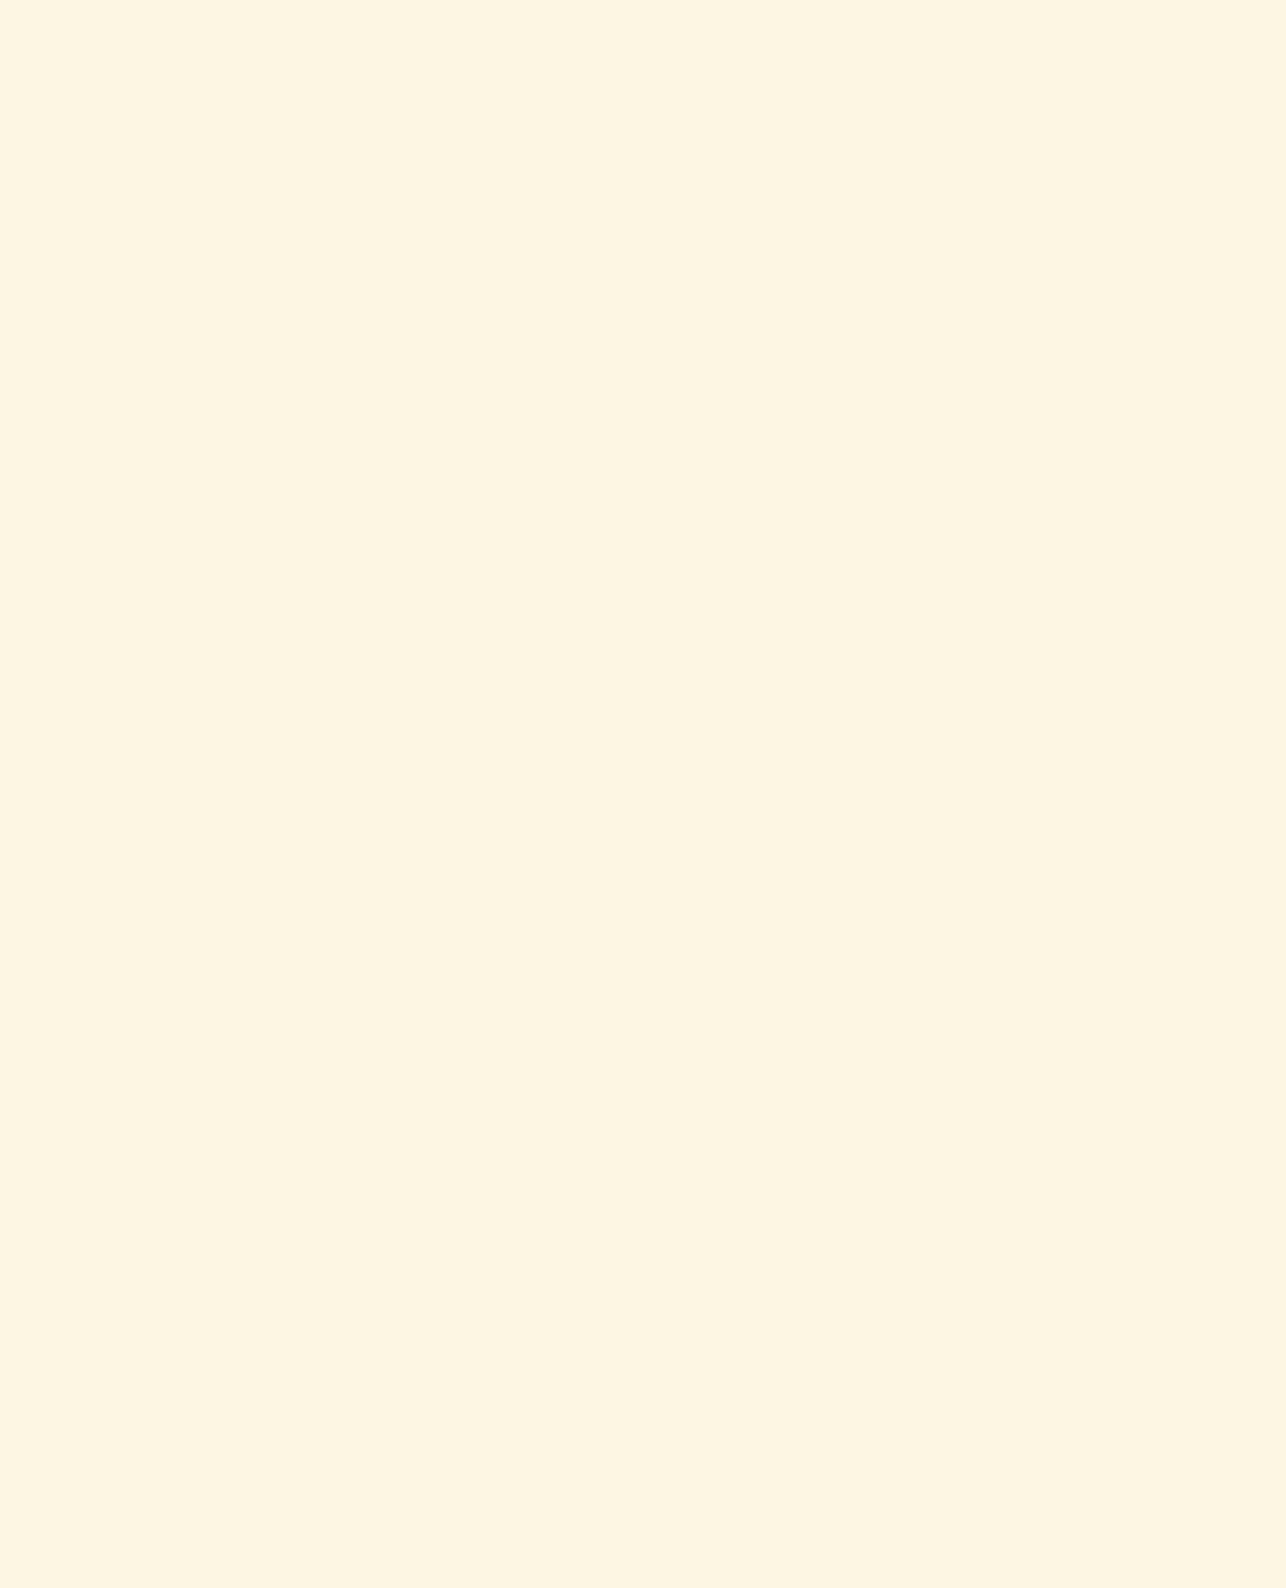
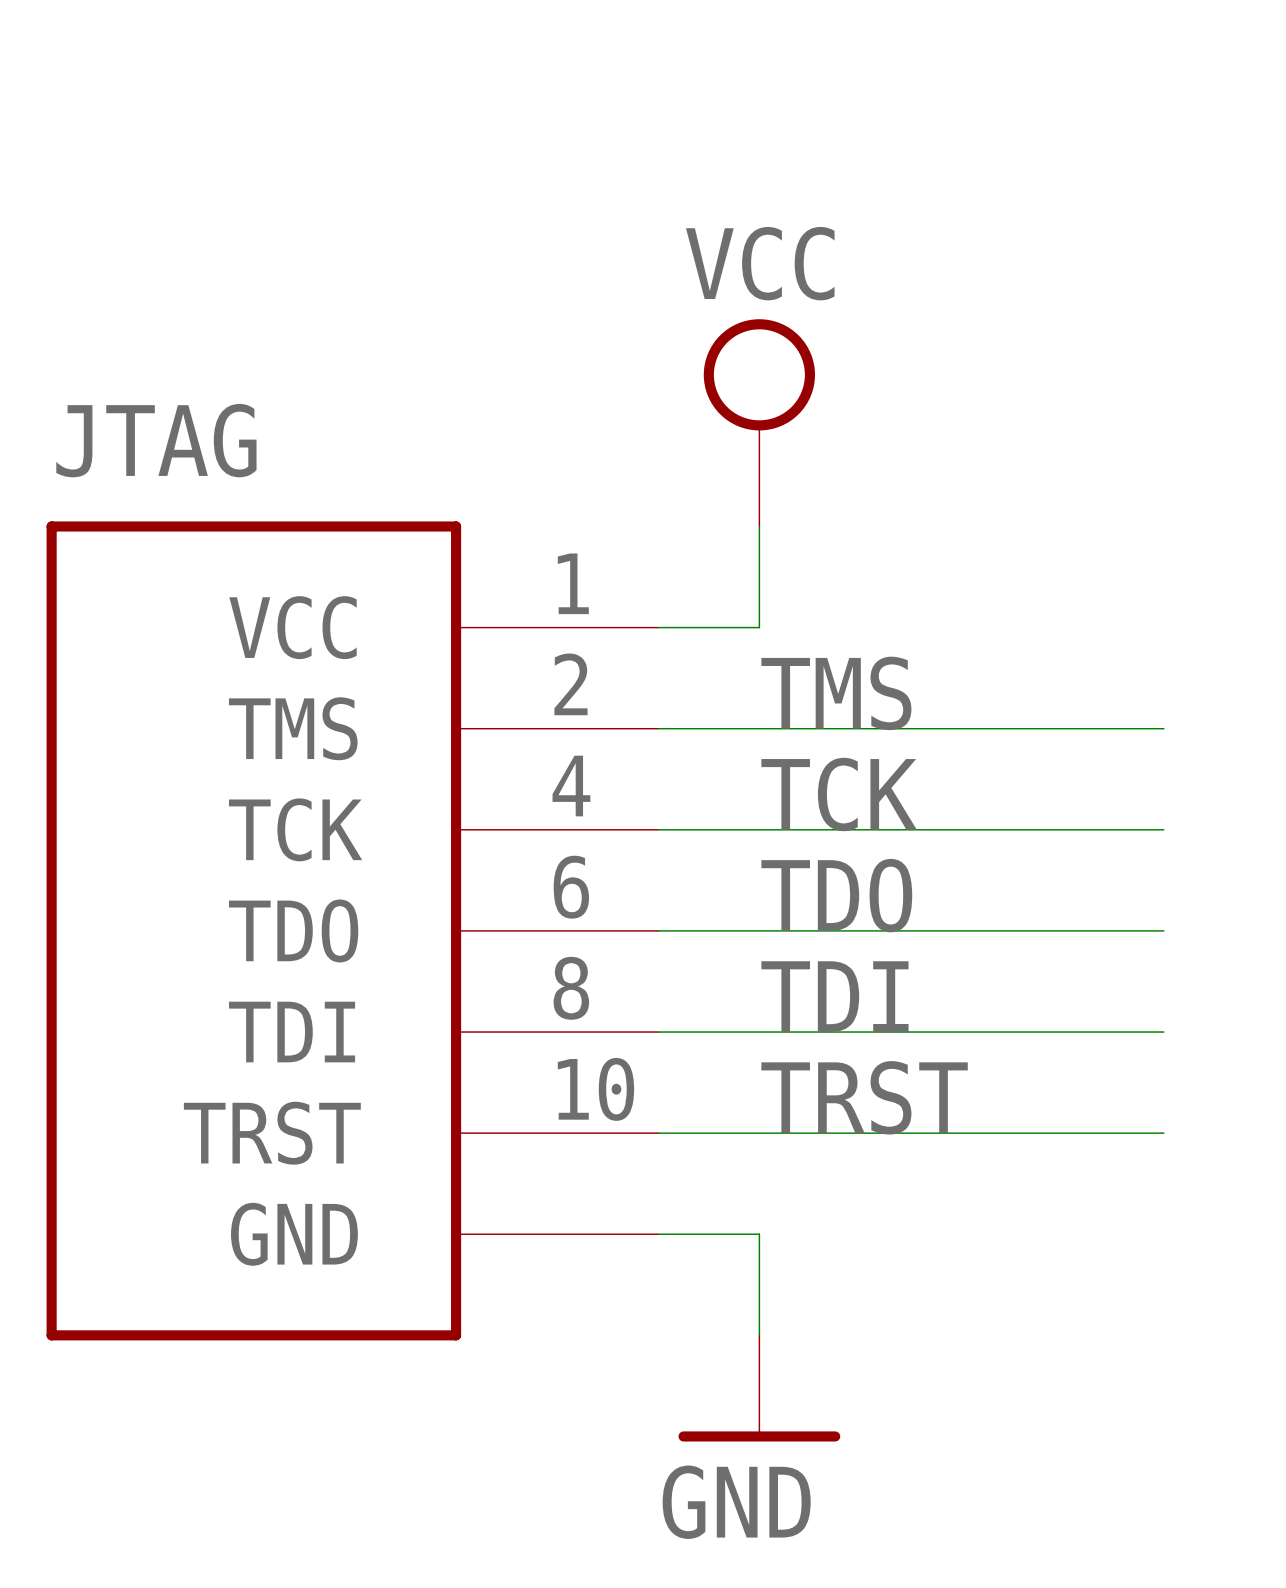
power symbol: none -> VCC (759, 422)
wire: none -> (759, 526) (759, 627) (658, 627)
label: none -> TMS (836, 693)
wire: none -> (658, 728) (1163, 728)
label: none -> TCK (839, 794)
wire: none -> (658, 829) (1163, 829)
label: none -> TDO (836, 895)
JTAG: none -> (352, 930)
wire: none -> (658, 930) (1163, 930)
label: none -> TDI (834, 996)
wire: none -> (658, 1032) (1163, 1032)
label: none -> TRST (864, 1097)
wire: none -> (658, 1133) (1163, 1133)
wire: none -> (658, 1234) (759, 1234) (759, 1335)
power symbol: none -> GND (759, 1388)

